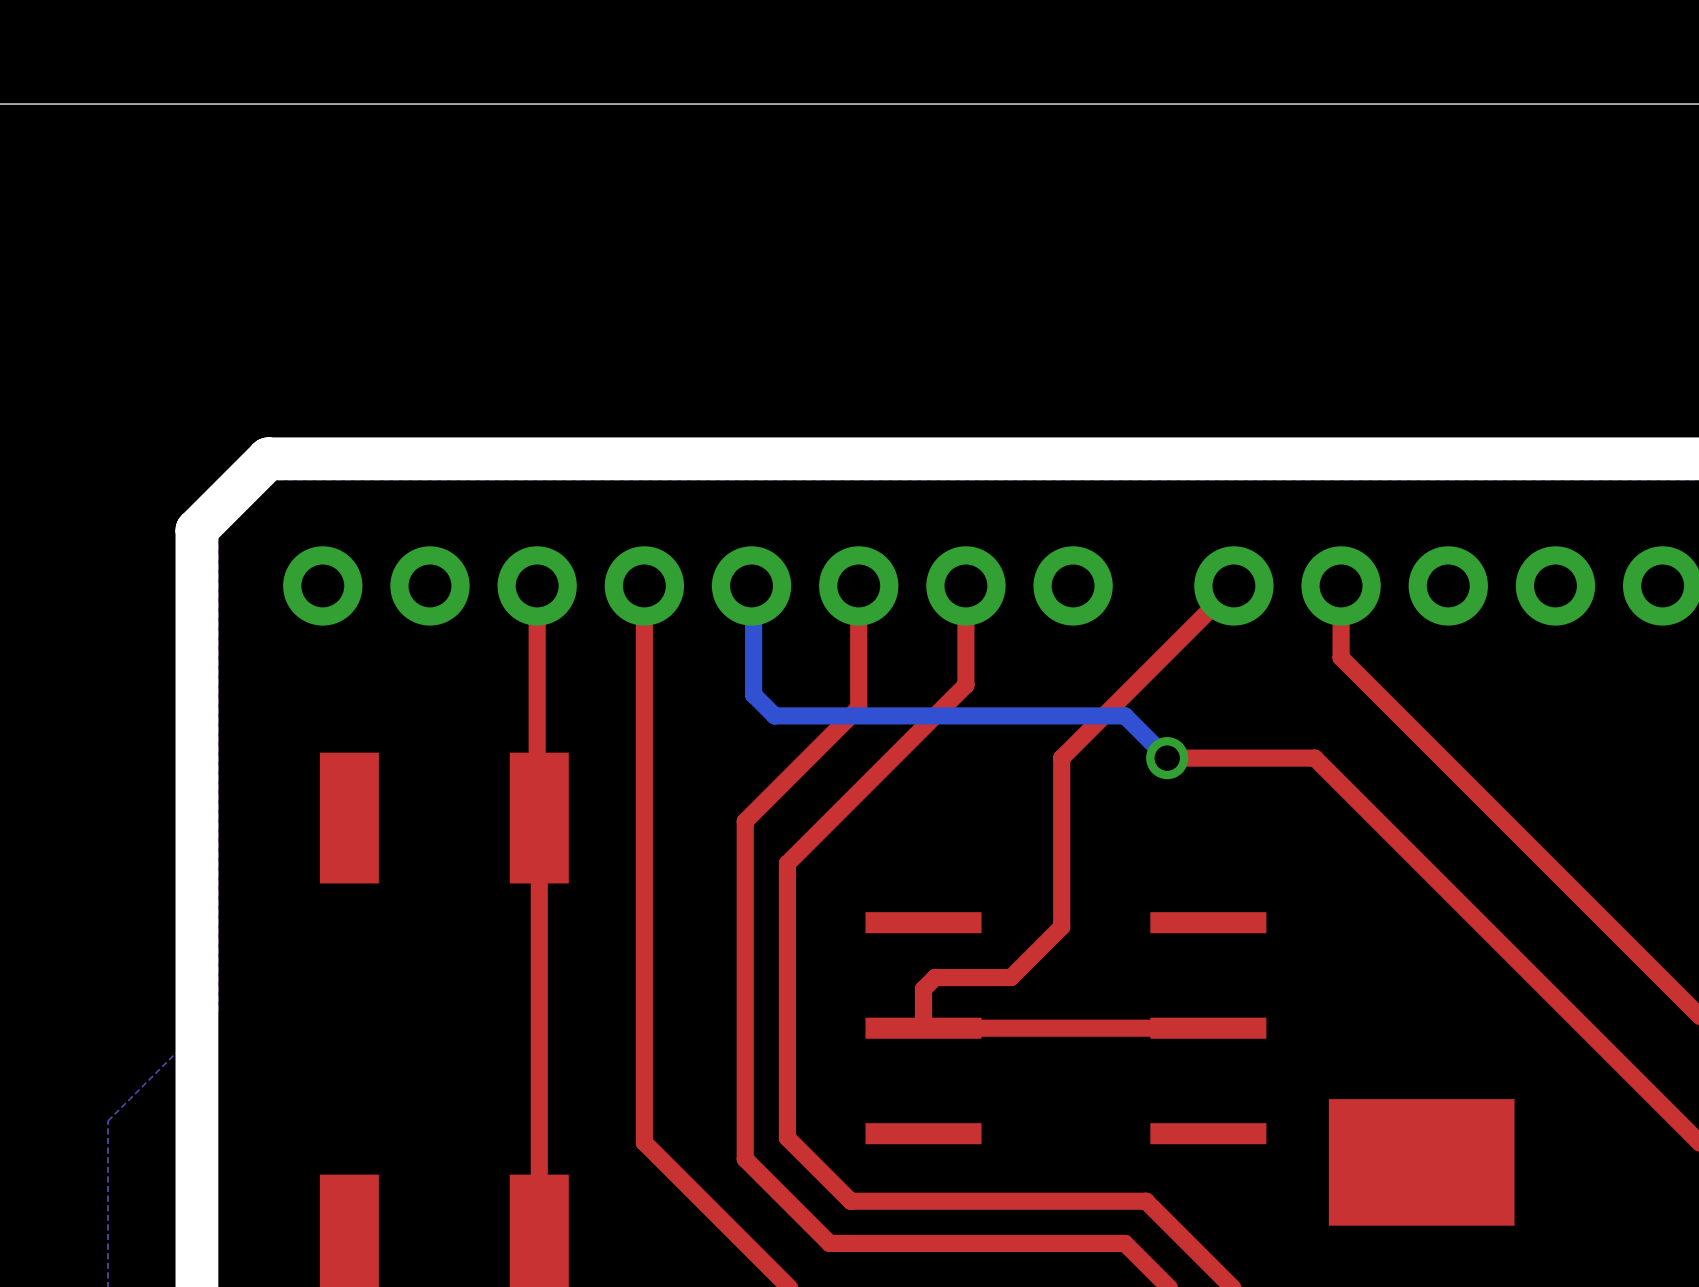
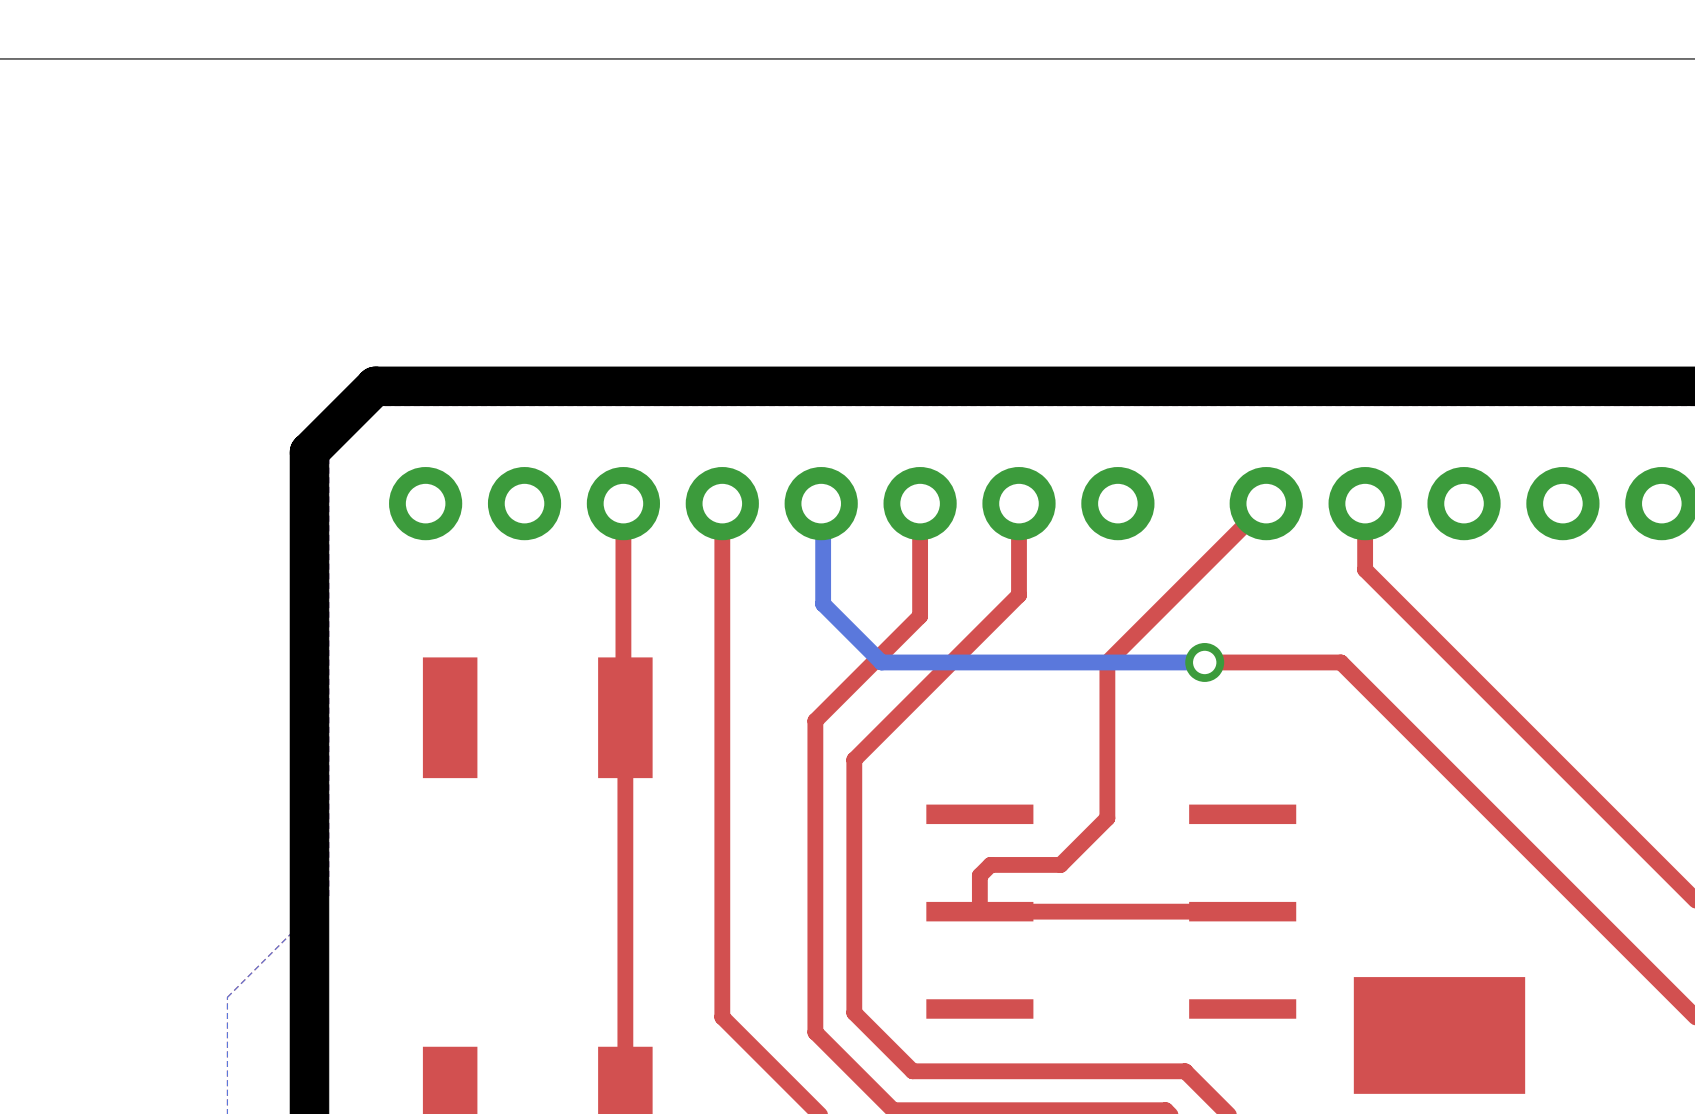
bottom track: (774, 715) (1125, 715) (1167, 758) -> (842, 623) (881, 662) (1204, 662)

